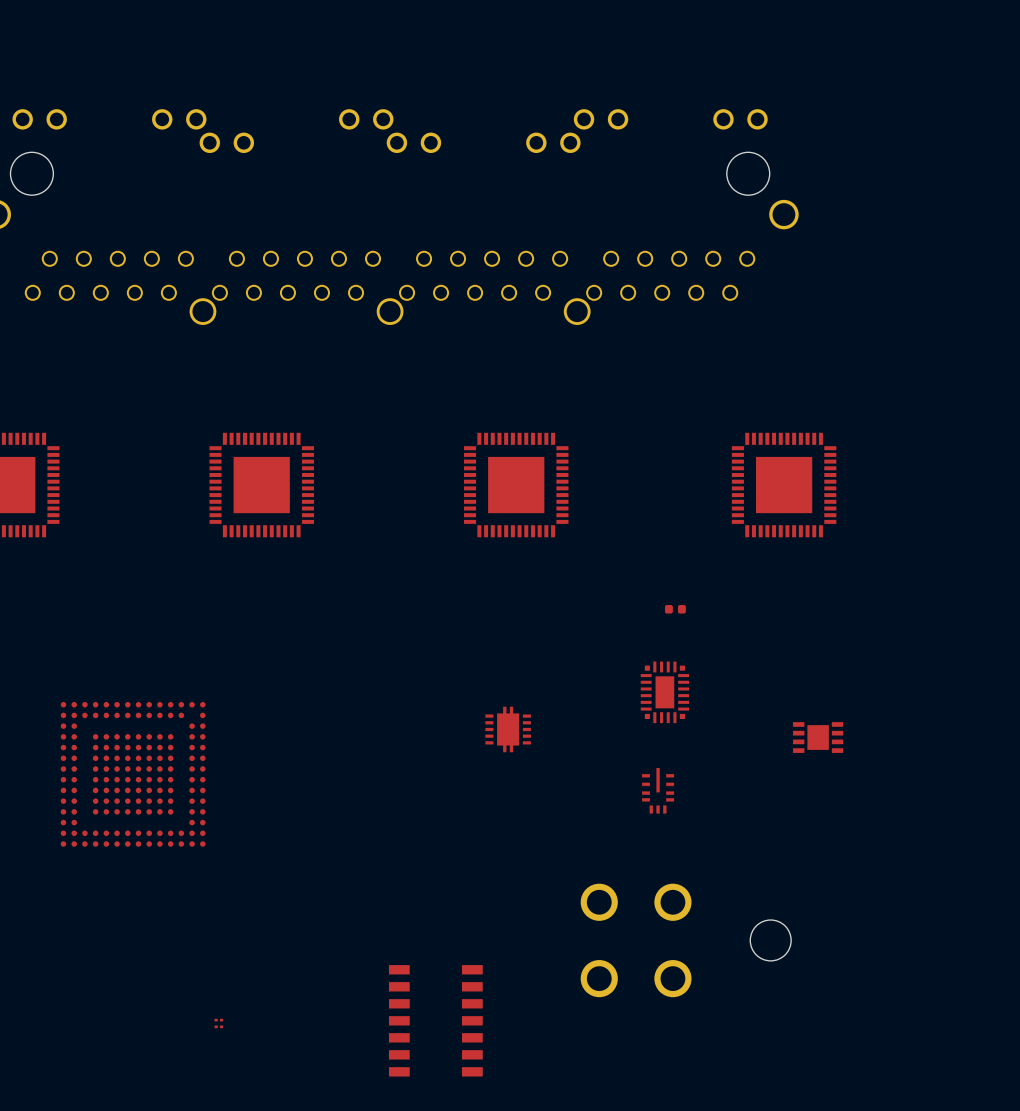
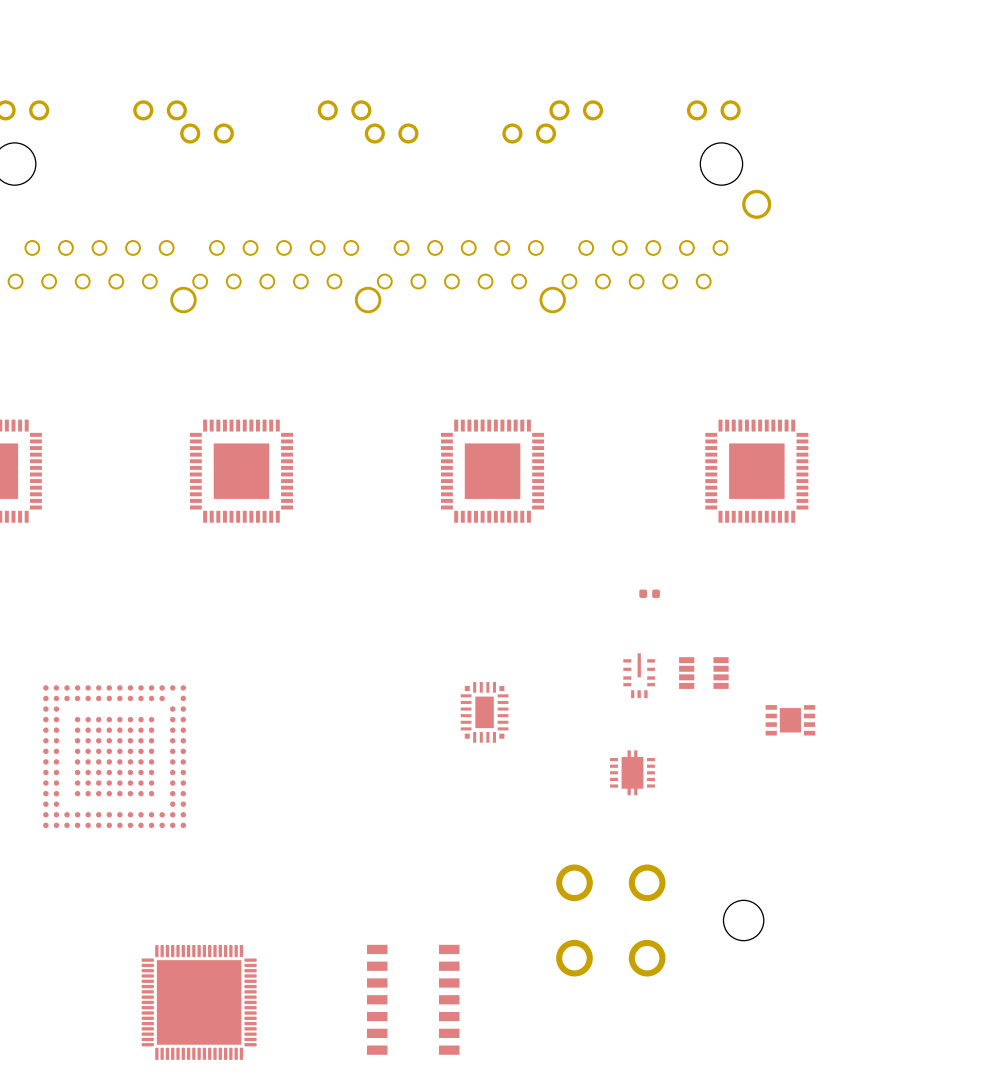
part footprint: [640, 661, 690, 724] -> [623, 653, 656, 699]
part: none -> (703, 673)
part footprint: [485, 706, 531, 753] -> [460, 681, 509, 743]
part footprint: [641, 767, 675, 814] -> [610, 750, 655, 796]
part footprint: [214, 1018, 224, 1029] -> [141, 944, 257, 1060]

